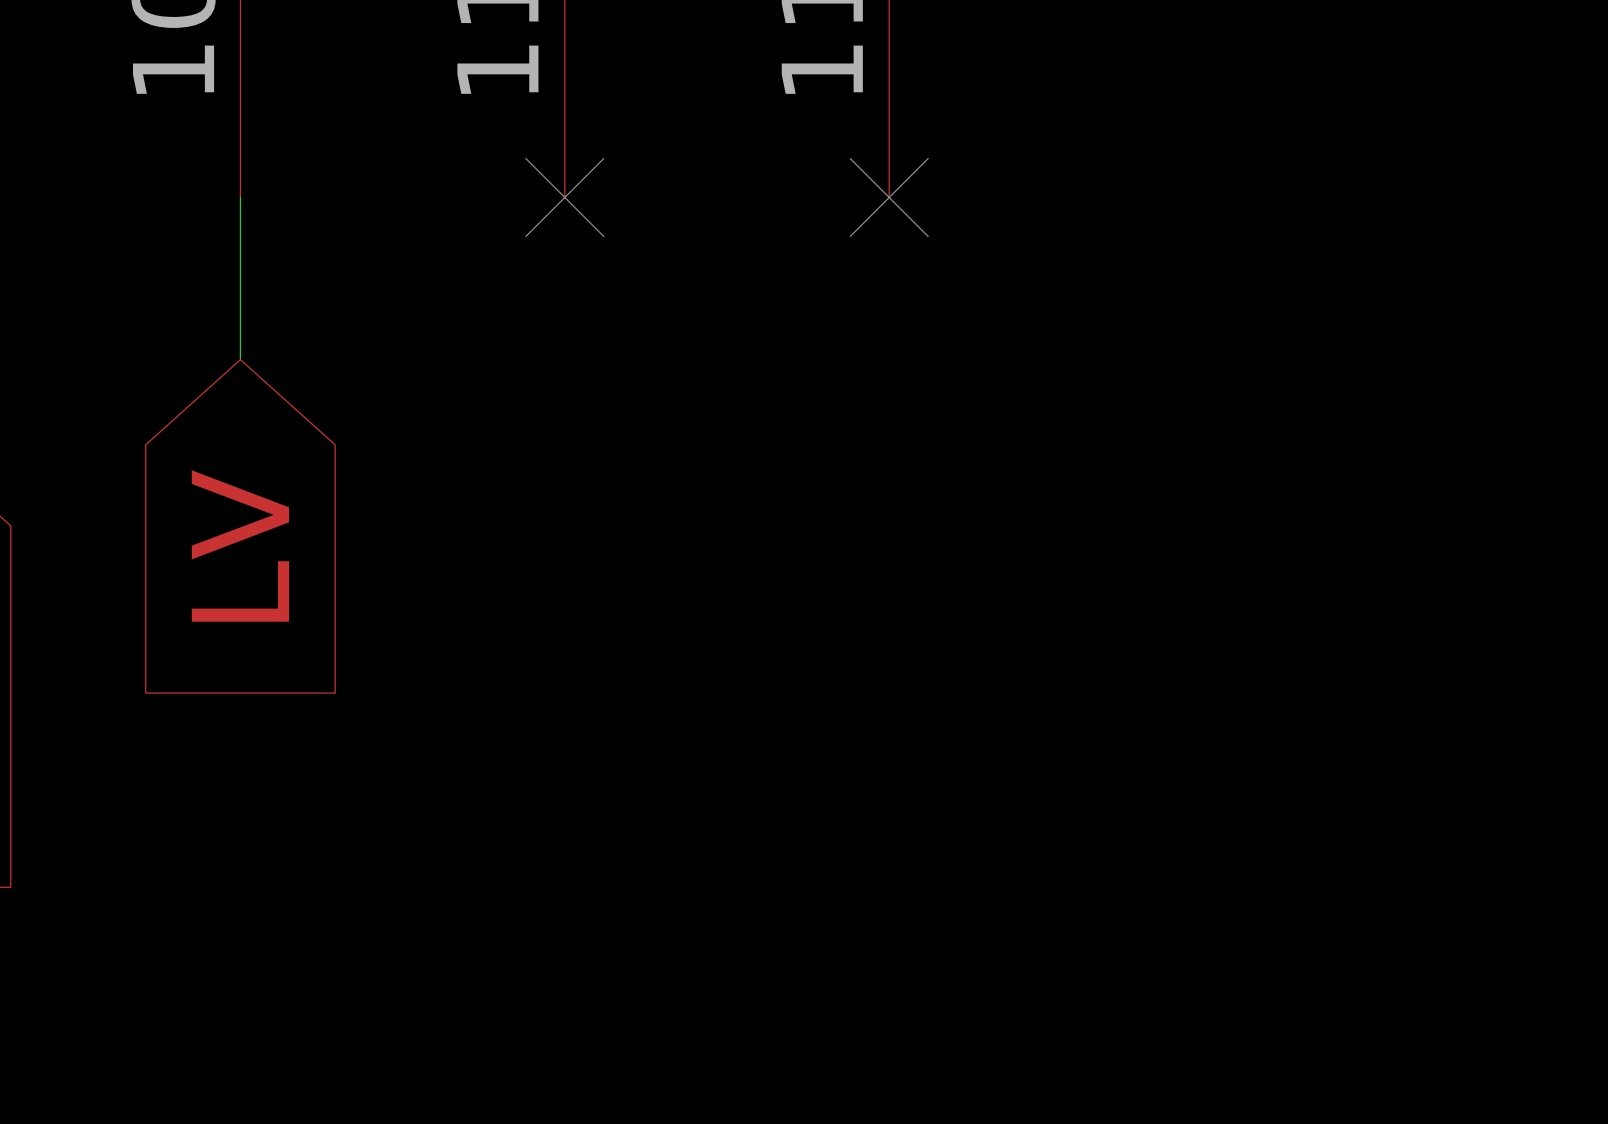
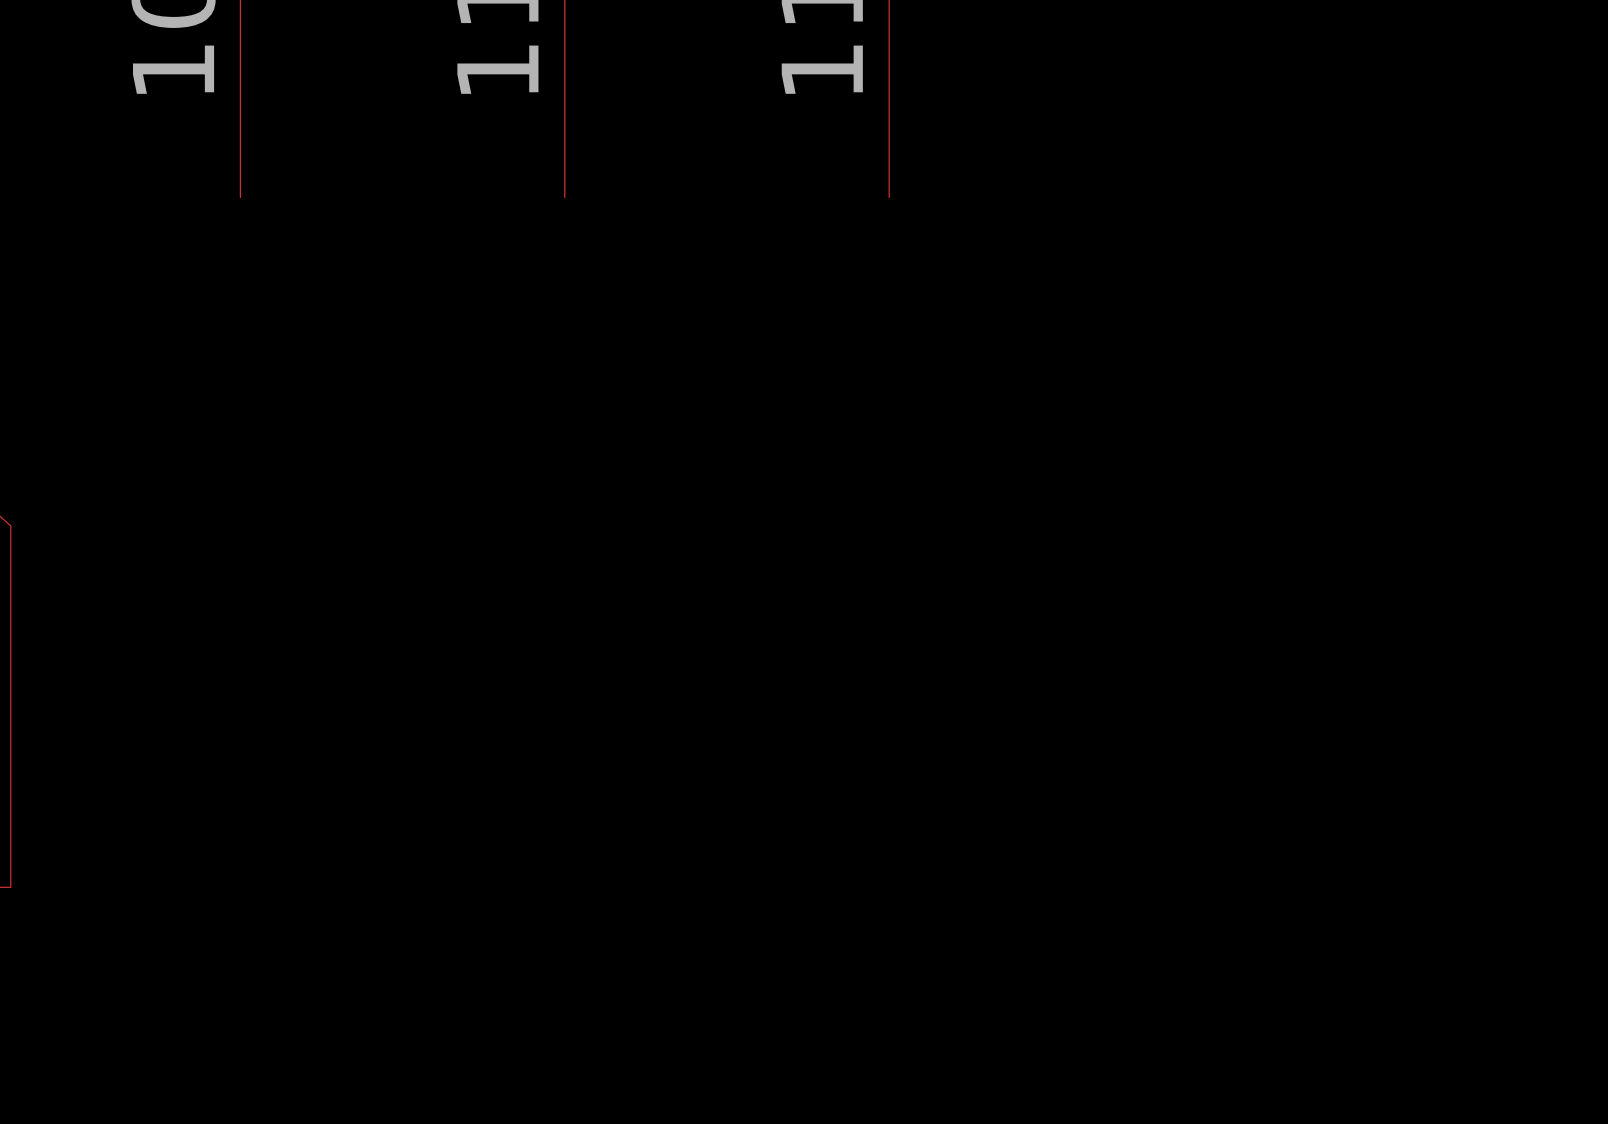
wire: (240, 197) (240, 359) -> none
no-connect mark: (564, 197) -> none
no-connect mark: (889, 197) -> none
global label: LV (240, 546) -> none

